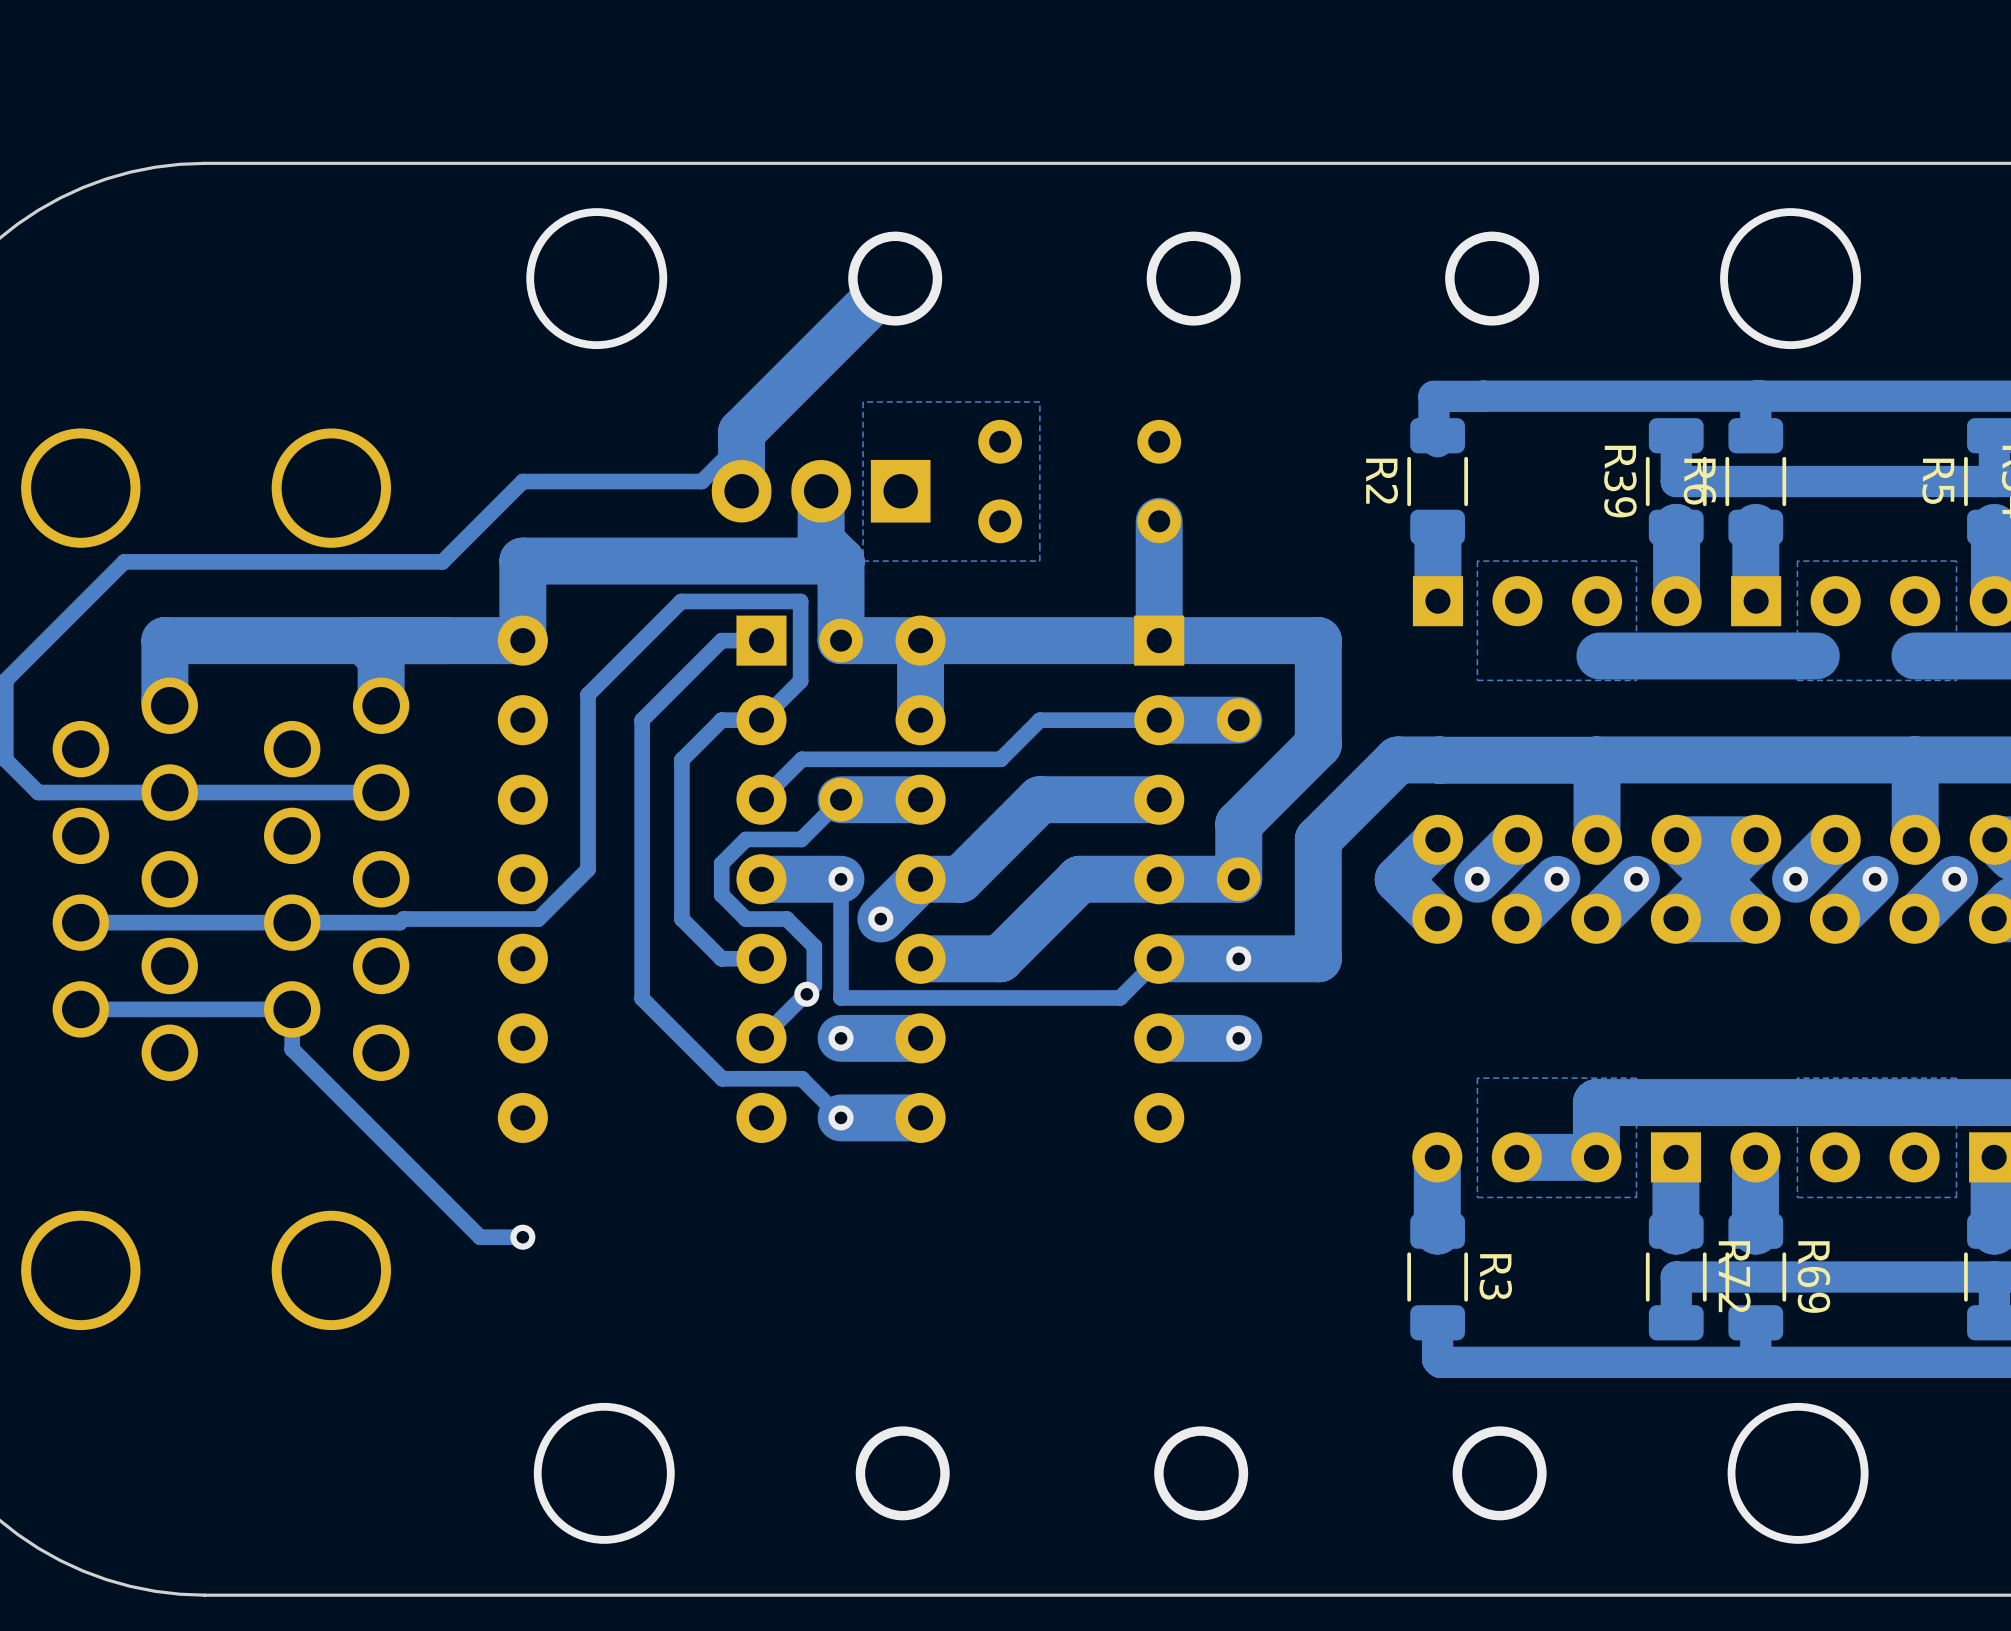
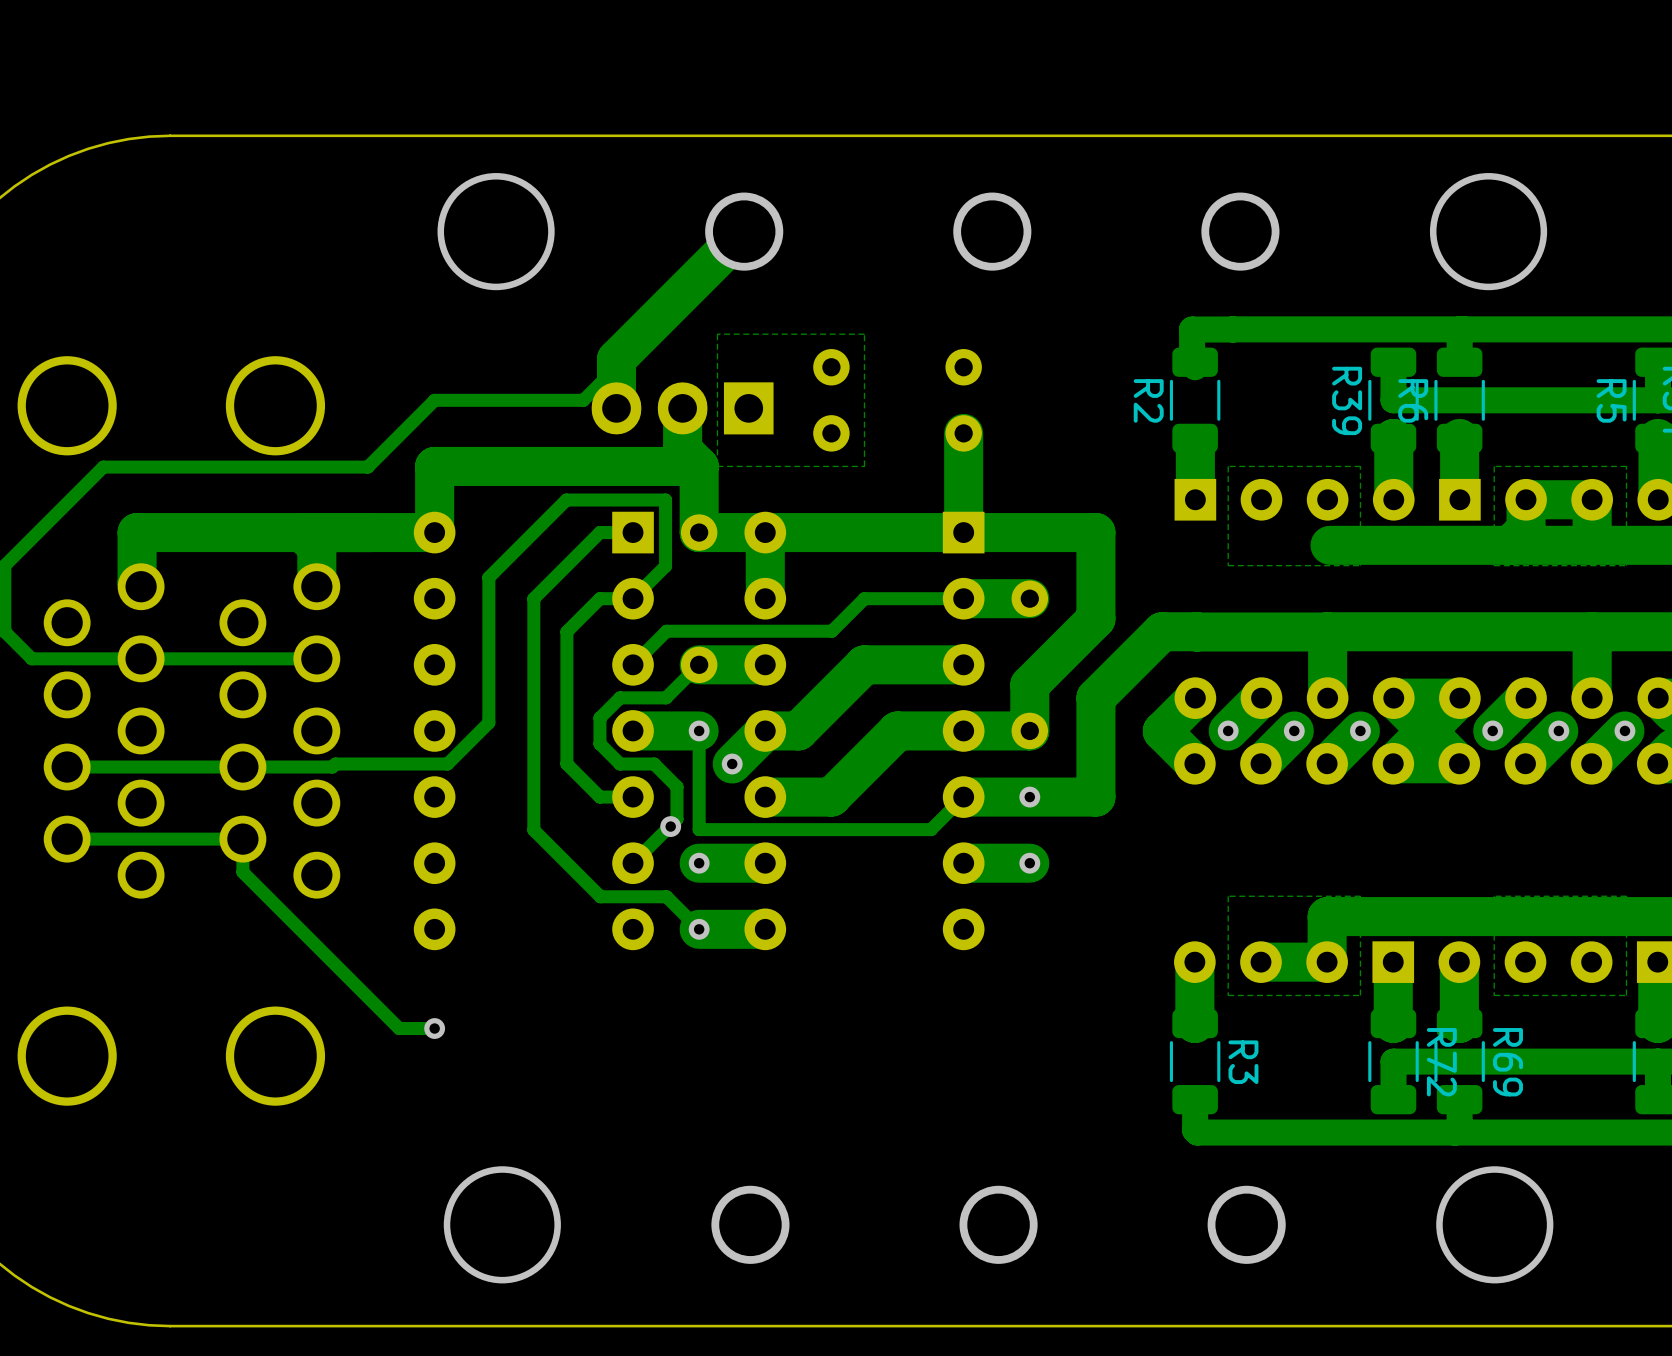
track: none -> (1592, 545) (1592, 499) (1526, 499) (1526, 529) (1509, 545) (1591, 545)

